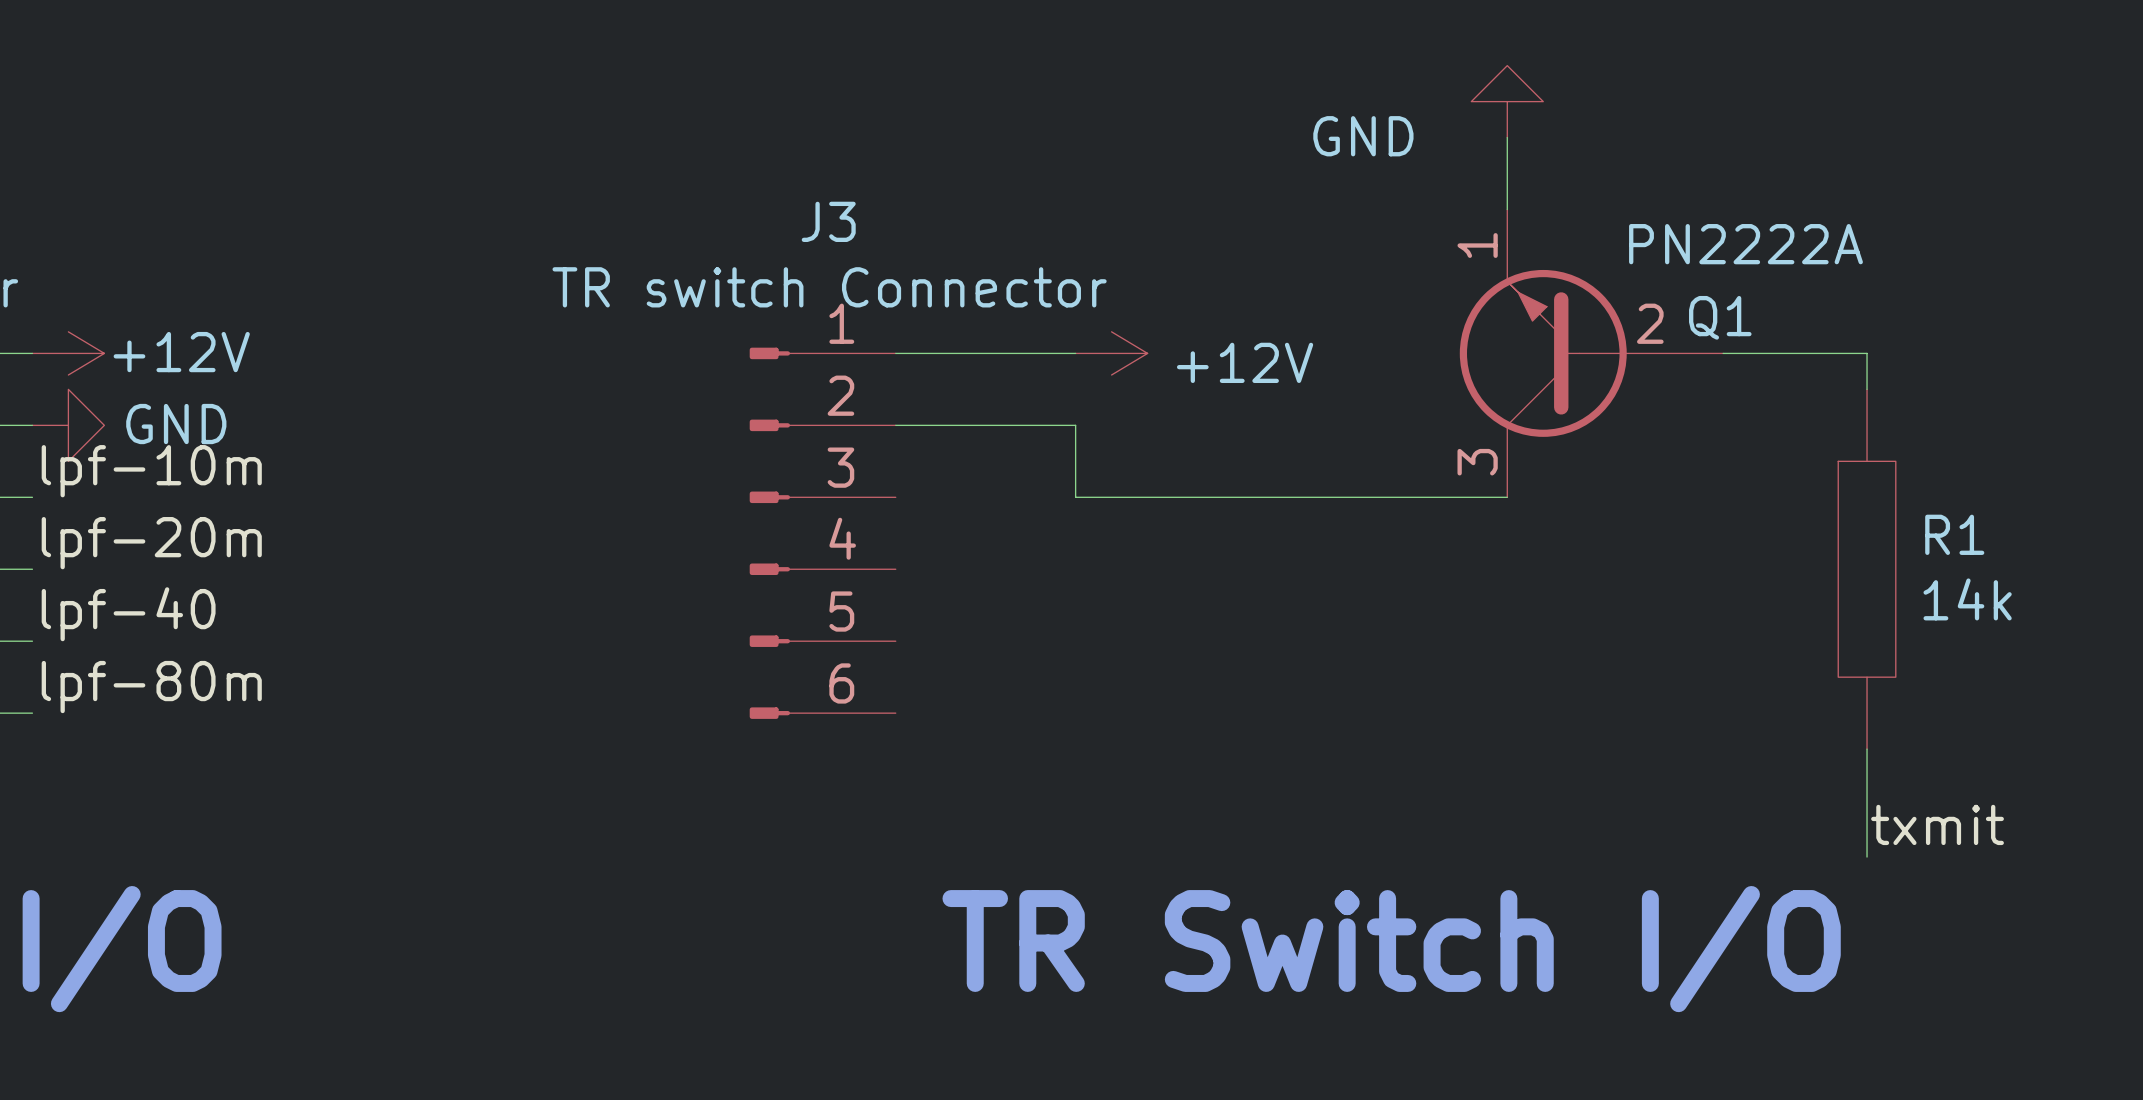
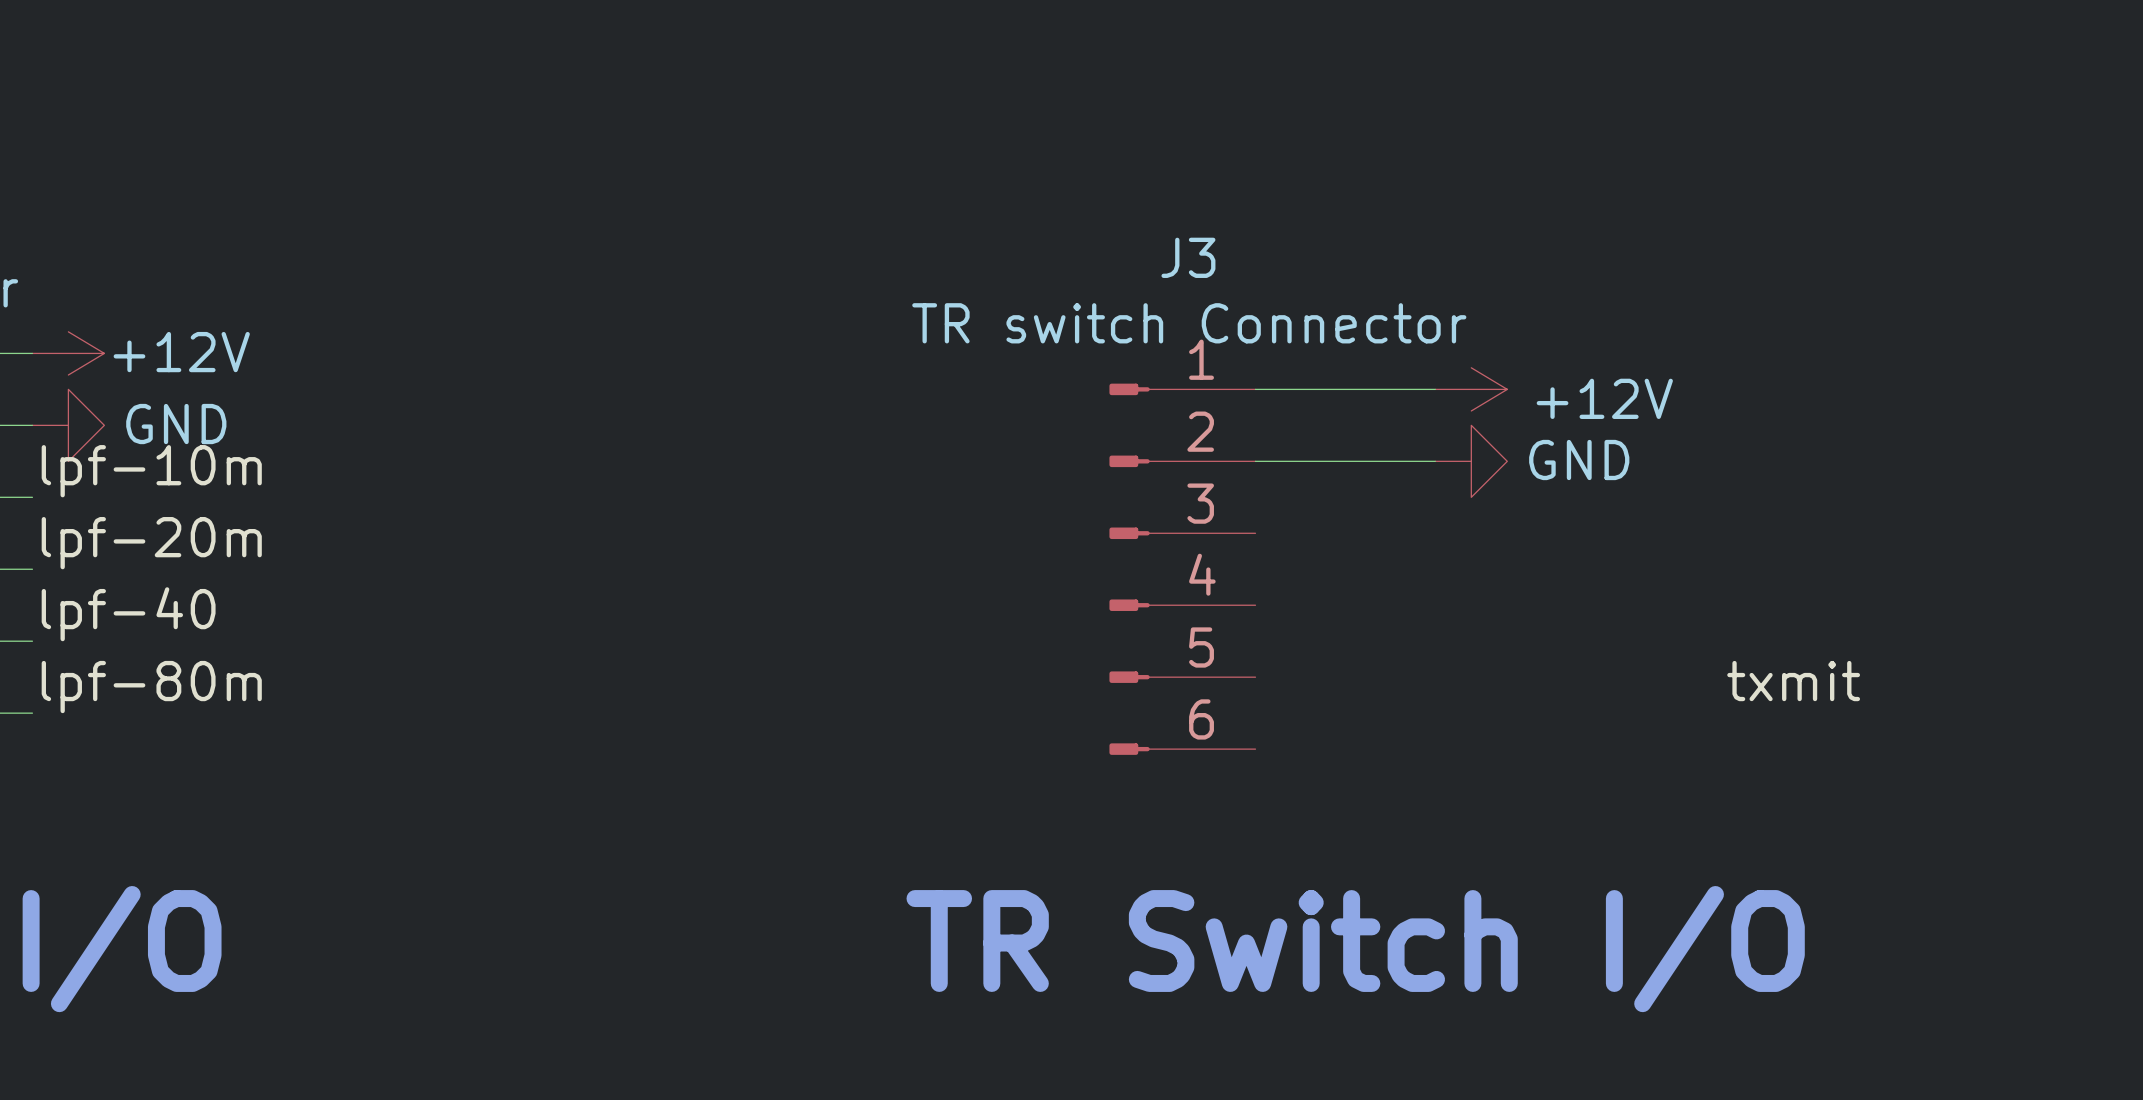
power symbol rotation: 0° (1507, 101) -> 90° clockwise (1471, 461)
power symbol position: GND (1507, 101) -> GND (1471, 461)
power symbol text position: GND (1363, 136) -> GND (1579, 459)
wire: (1507, 137) (1507, 209) -> none
wire: (895, 353) (1075, 353) -> (1255, 389) (1435, 389)
power symbol position: +12V (1111, 353) -> +12V (1471, 389)
Q1: PN2222A (1591, 353) -> none
wire: (1723, 353) (1867, 353) (1867, 389) -> none
wire: (895, 425) (1075, 425) (1075, 497) (1507, 497) -> none
wire: none -> (1255, 461) (1435, 461)
J3 position: (822, 533) -> (1182, 569)
R1: 14k (1867, 569) -> none
wire: (1867, 749) (1867, 857) -> none
label position: txmit (1937, 824) -> txmit (1793, 681)
text position: TR Switch I/O (1391, 949) -> TR Switch I/O (1355, 949)

